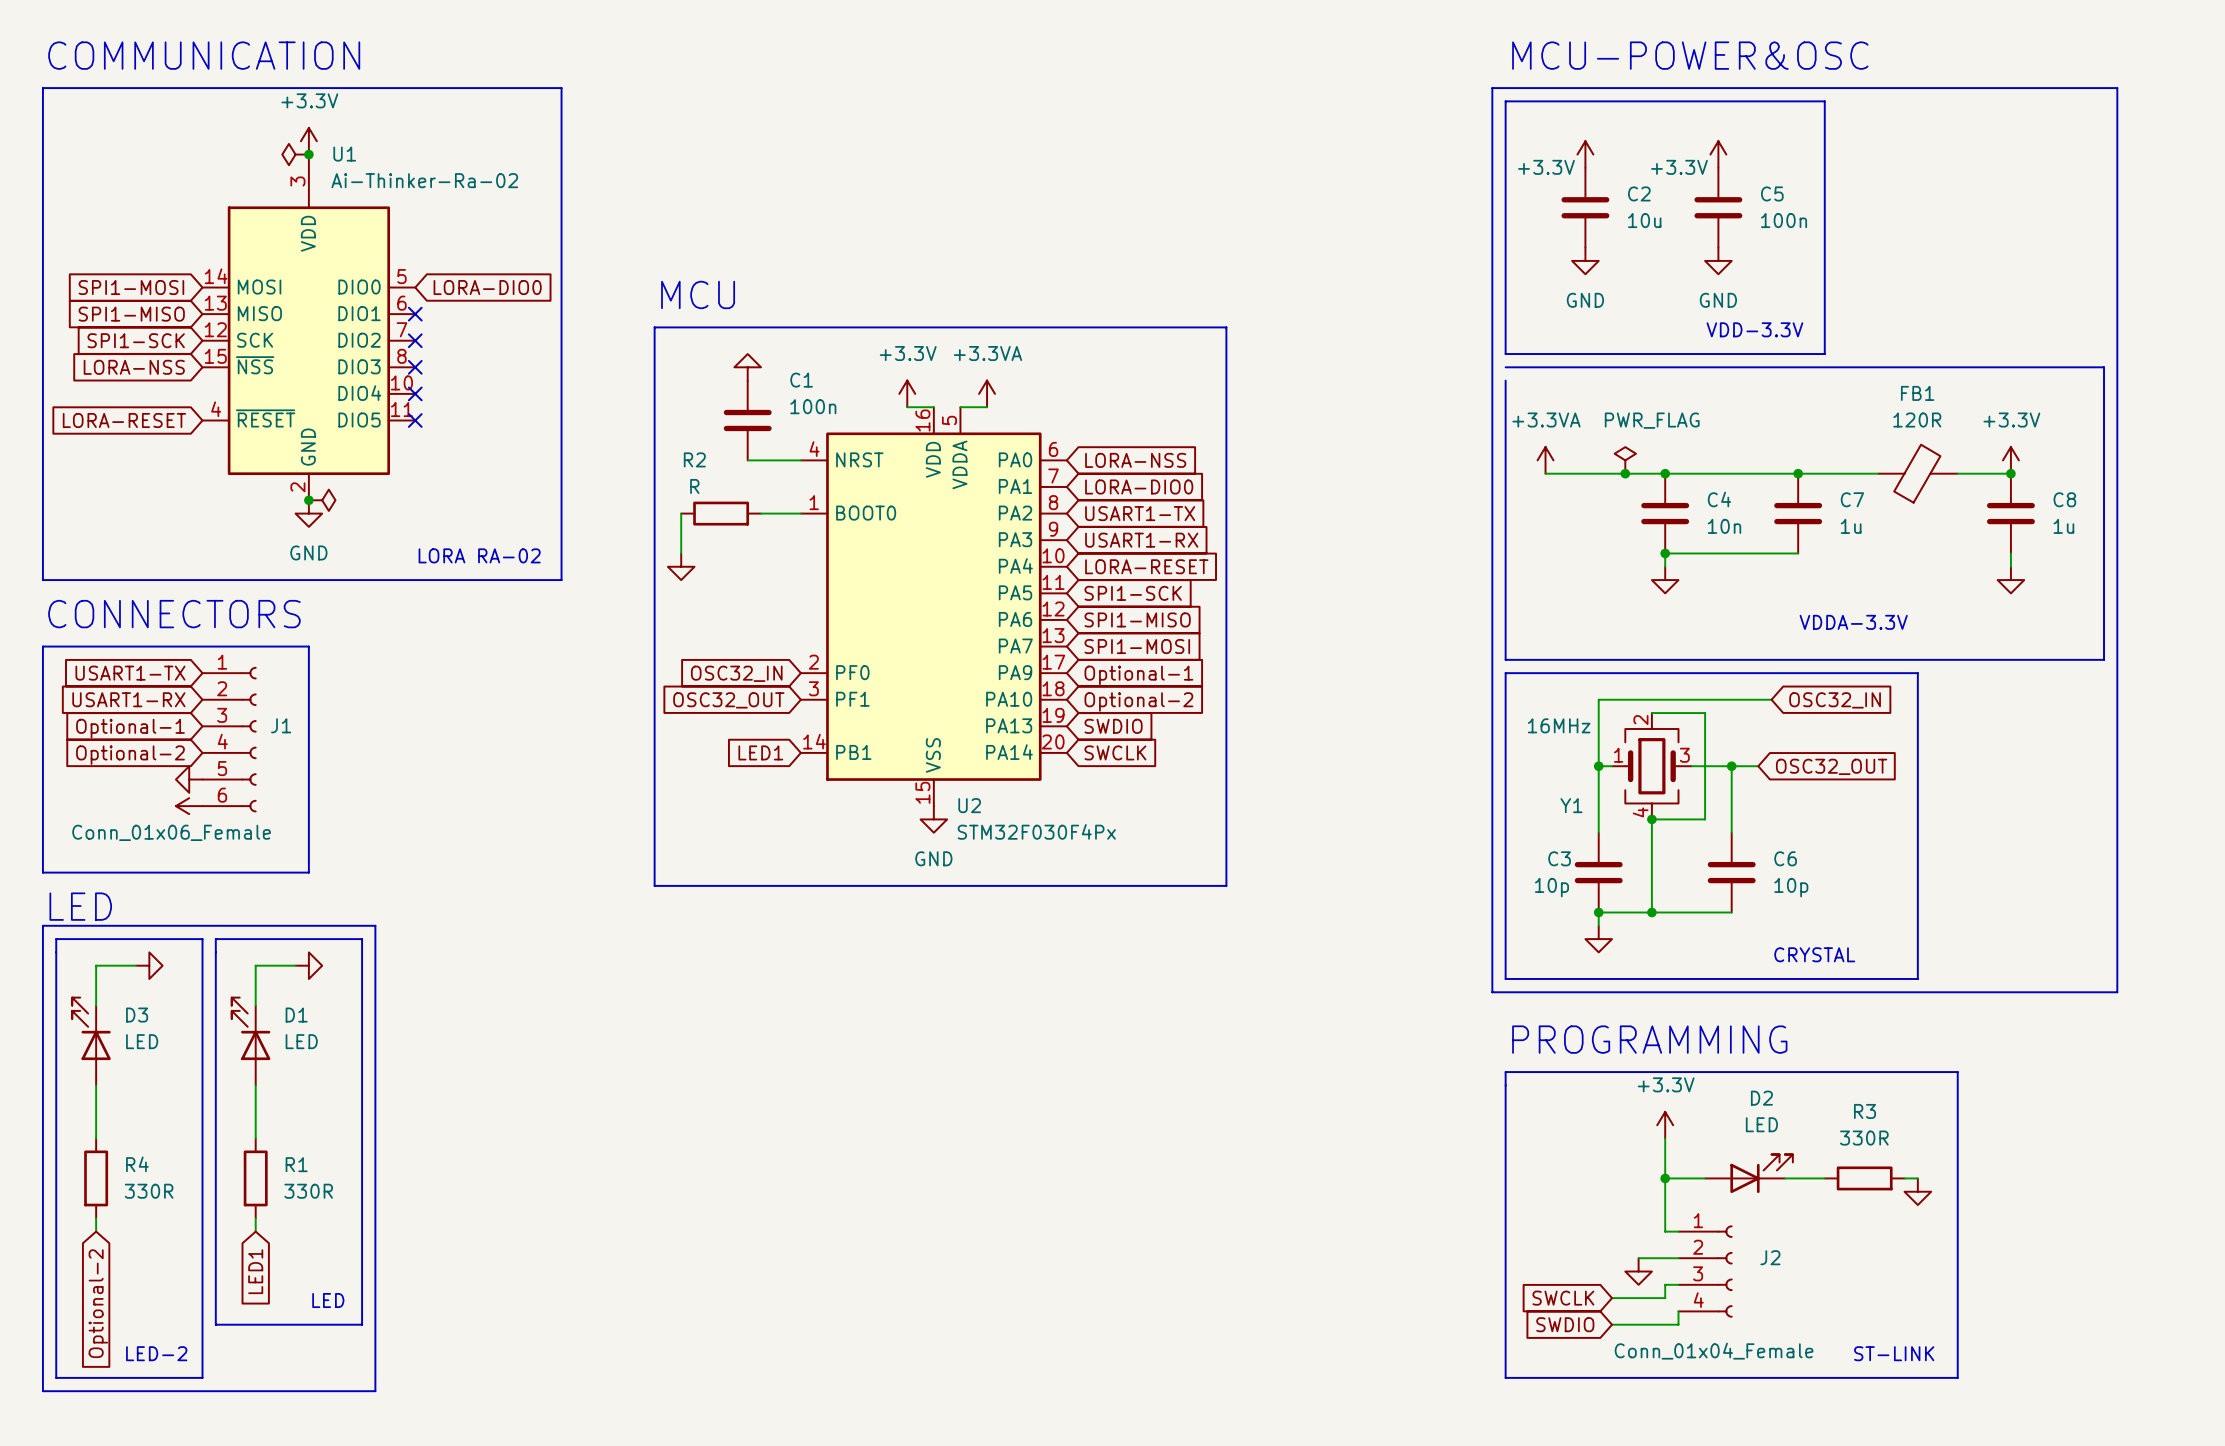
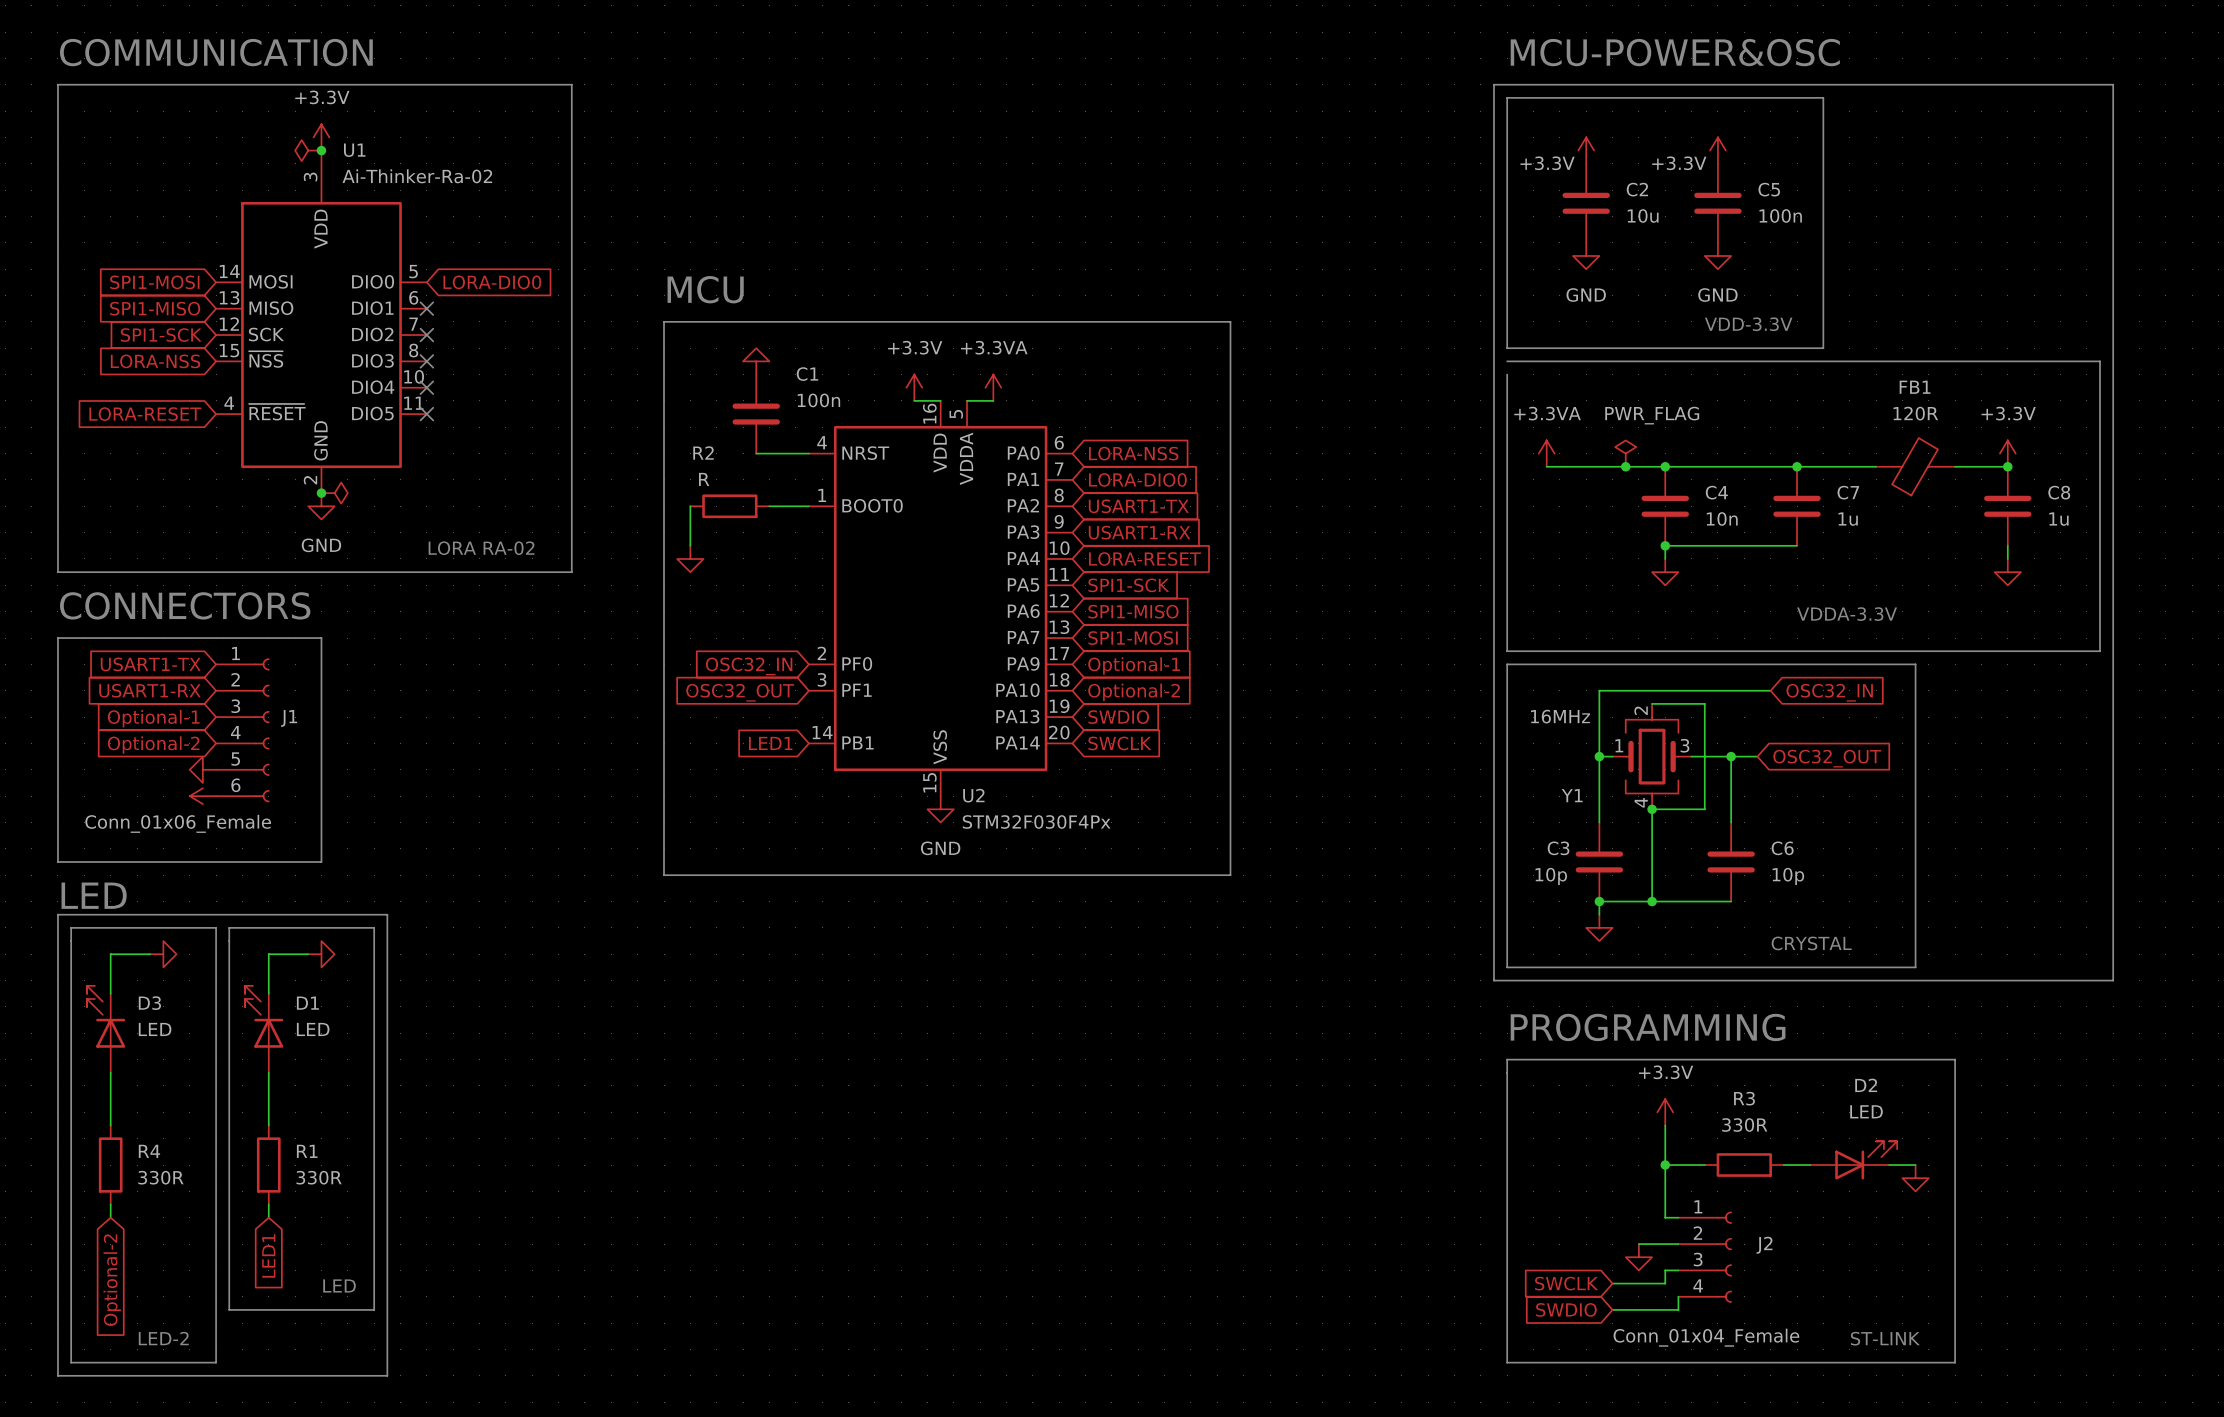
D2 position: (1748, 1173) -> (1853, 1160)
R3 position: (1864, 1178) -> (1744, 1165)

